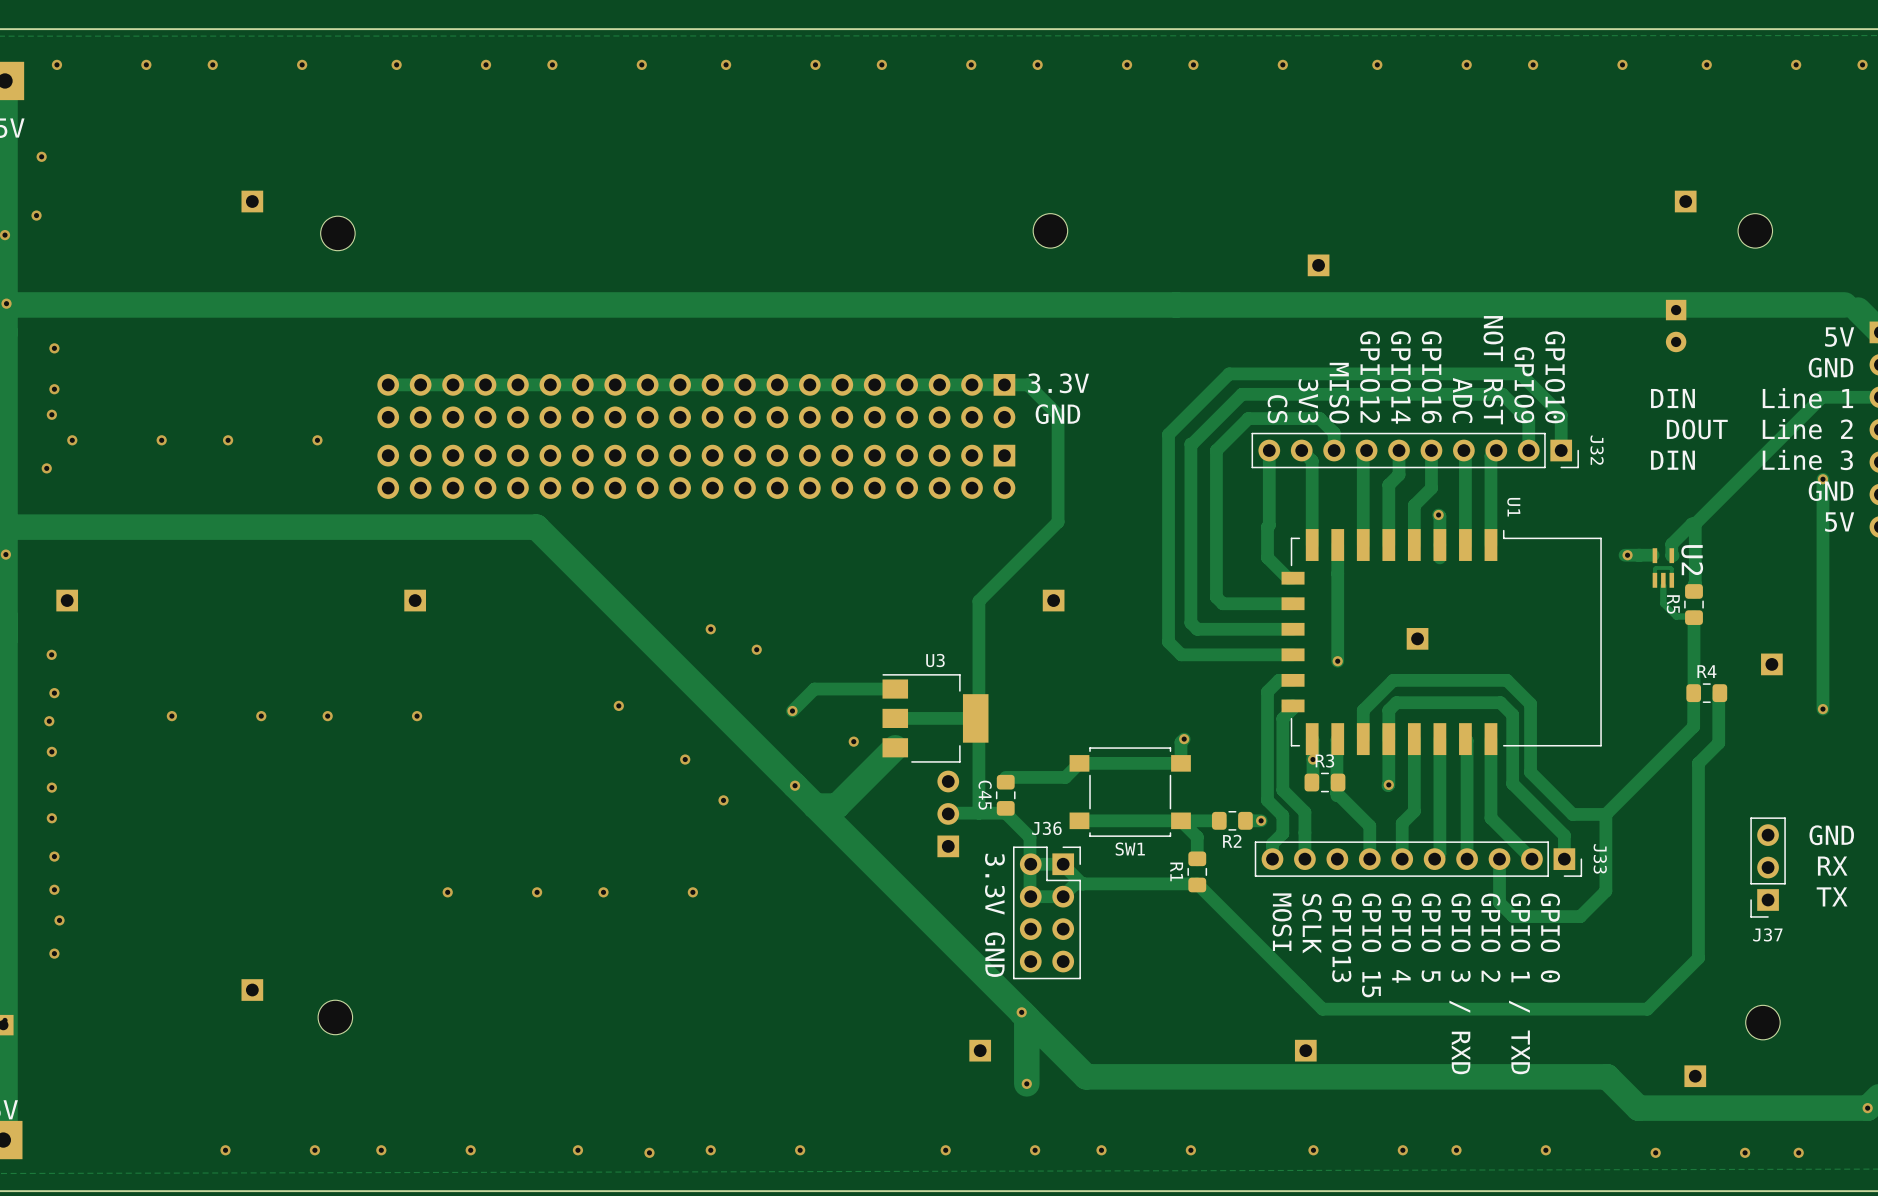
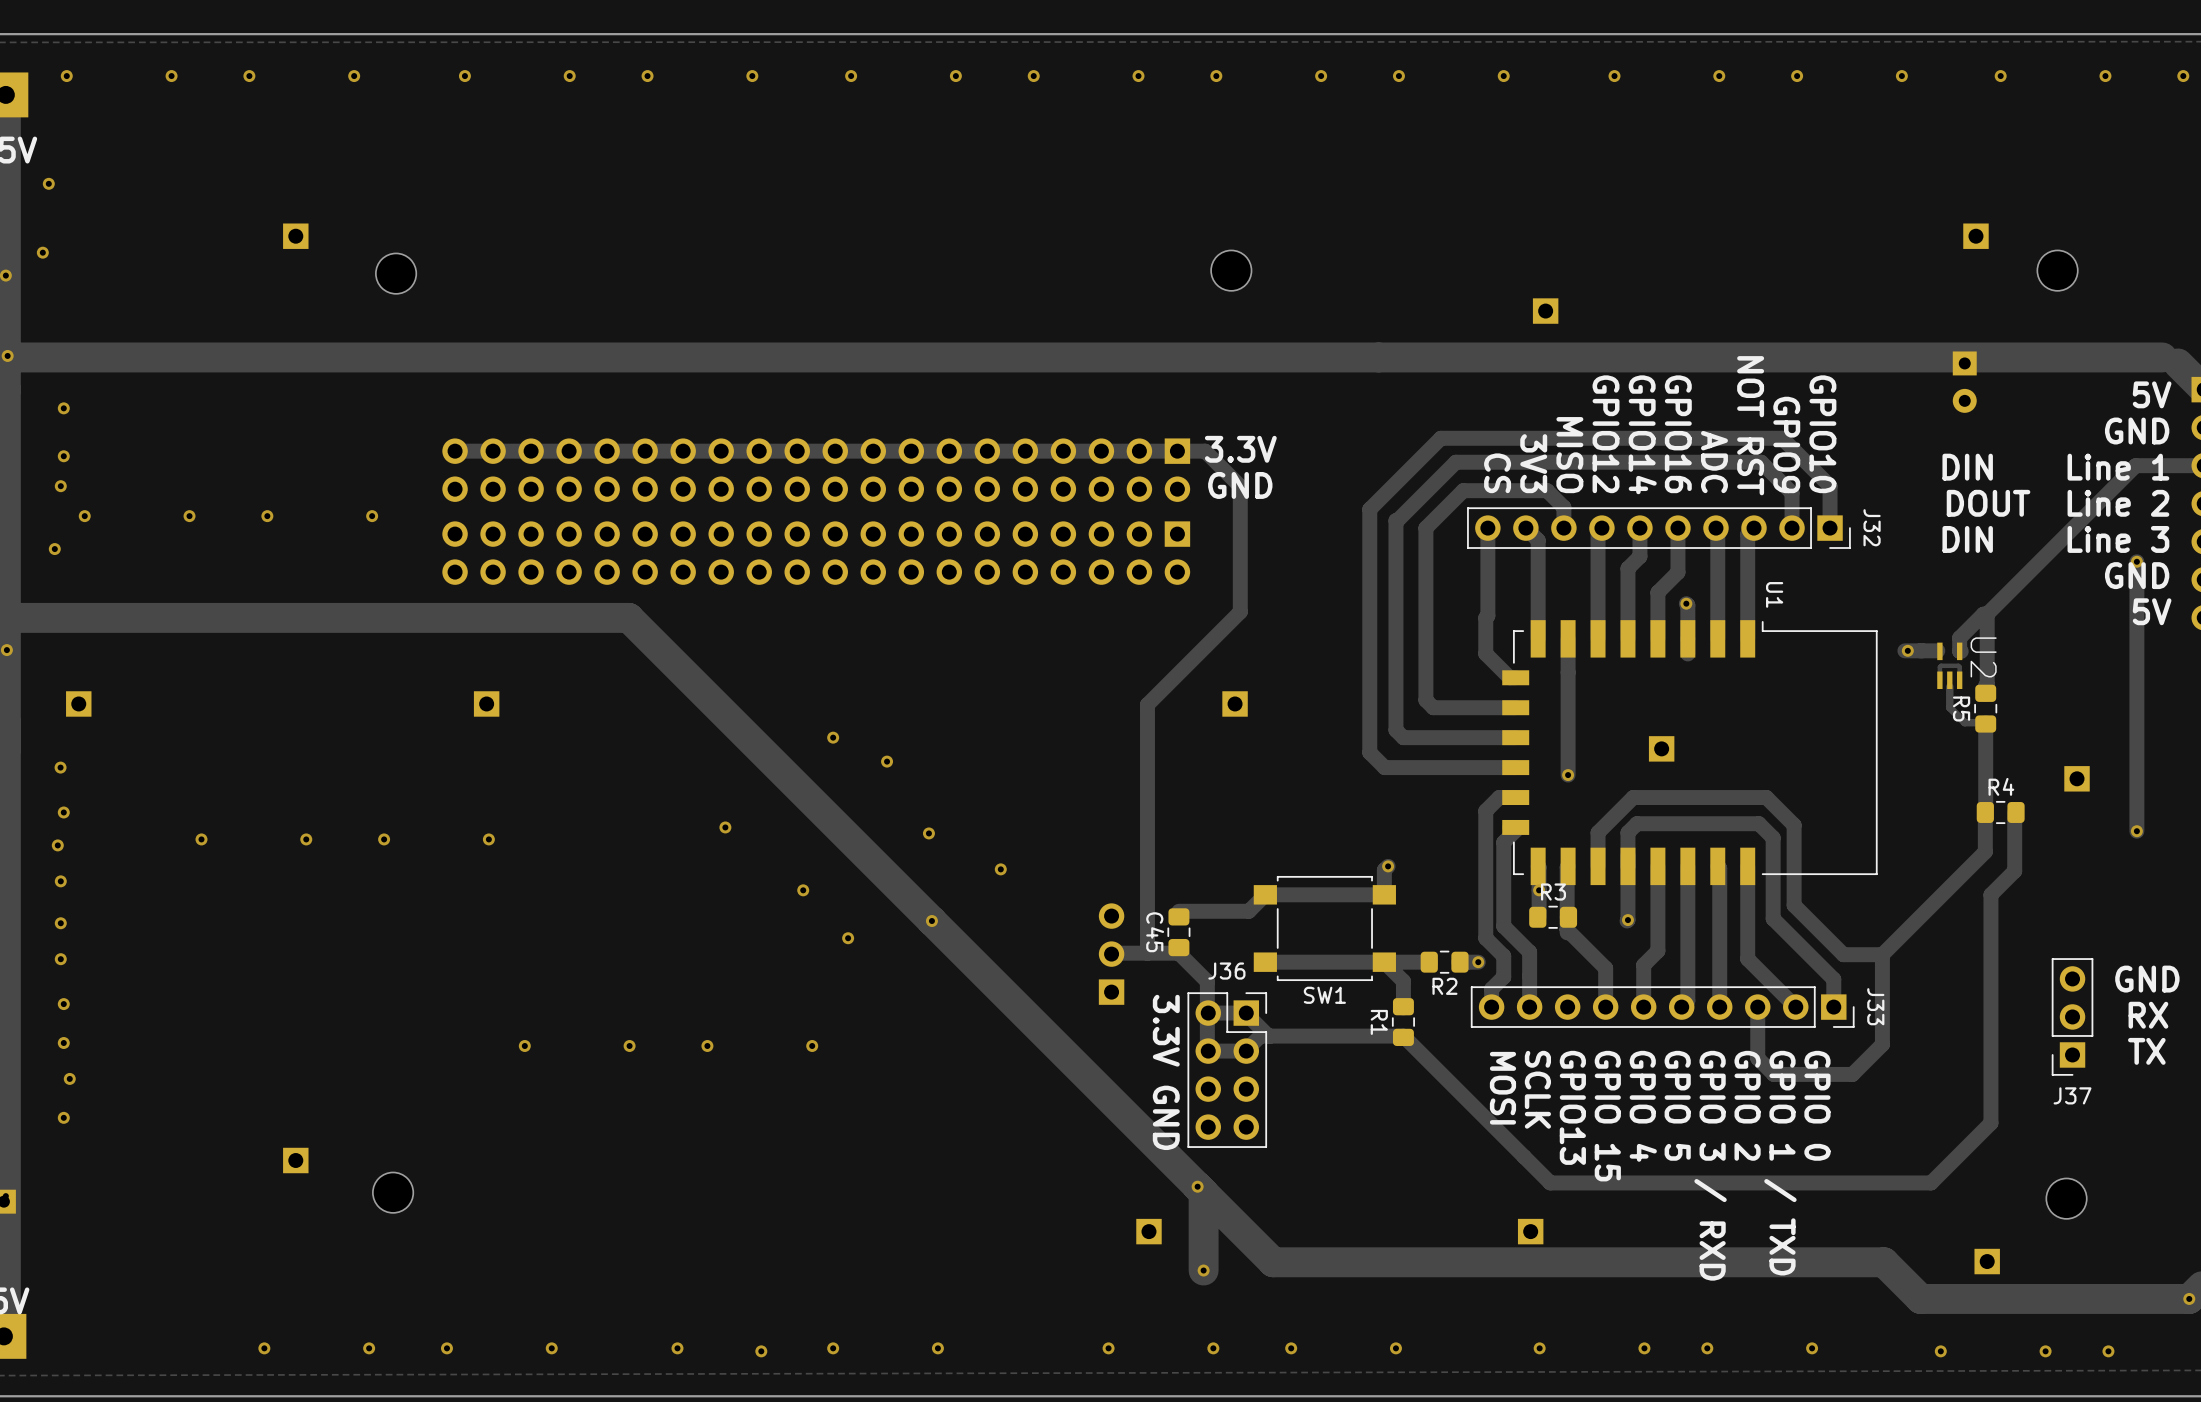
track: (895, 689) (814, 689) (792, 711) -> none
U3: (935, 718) -> none
track: (975, 718) (895, 718) -> none
track: (895, 747) (836, 806) (815, 806) -> none

